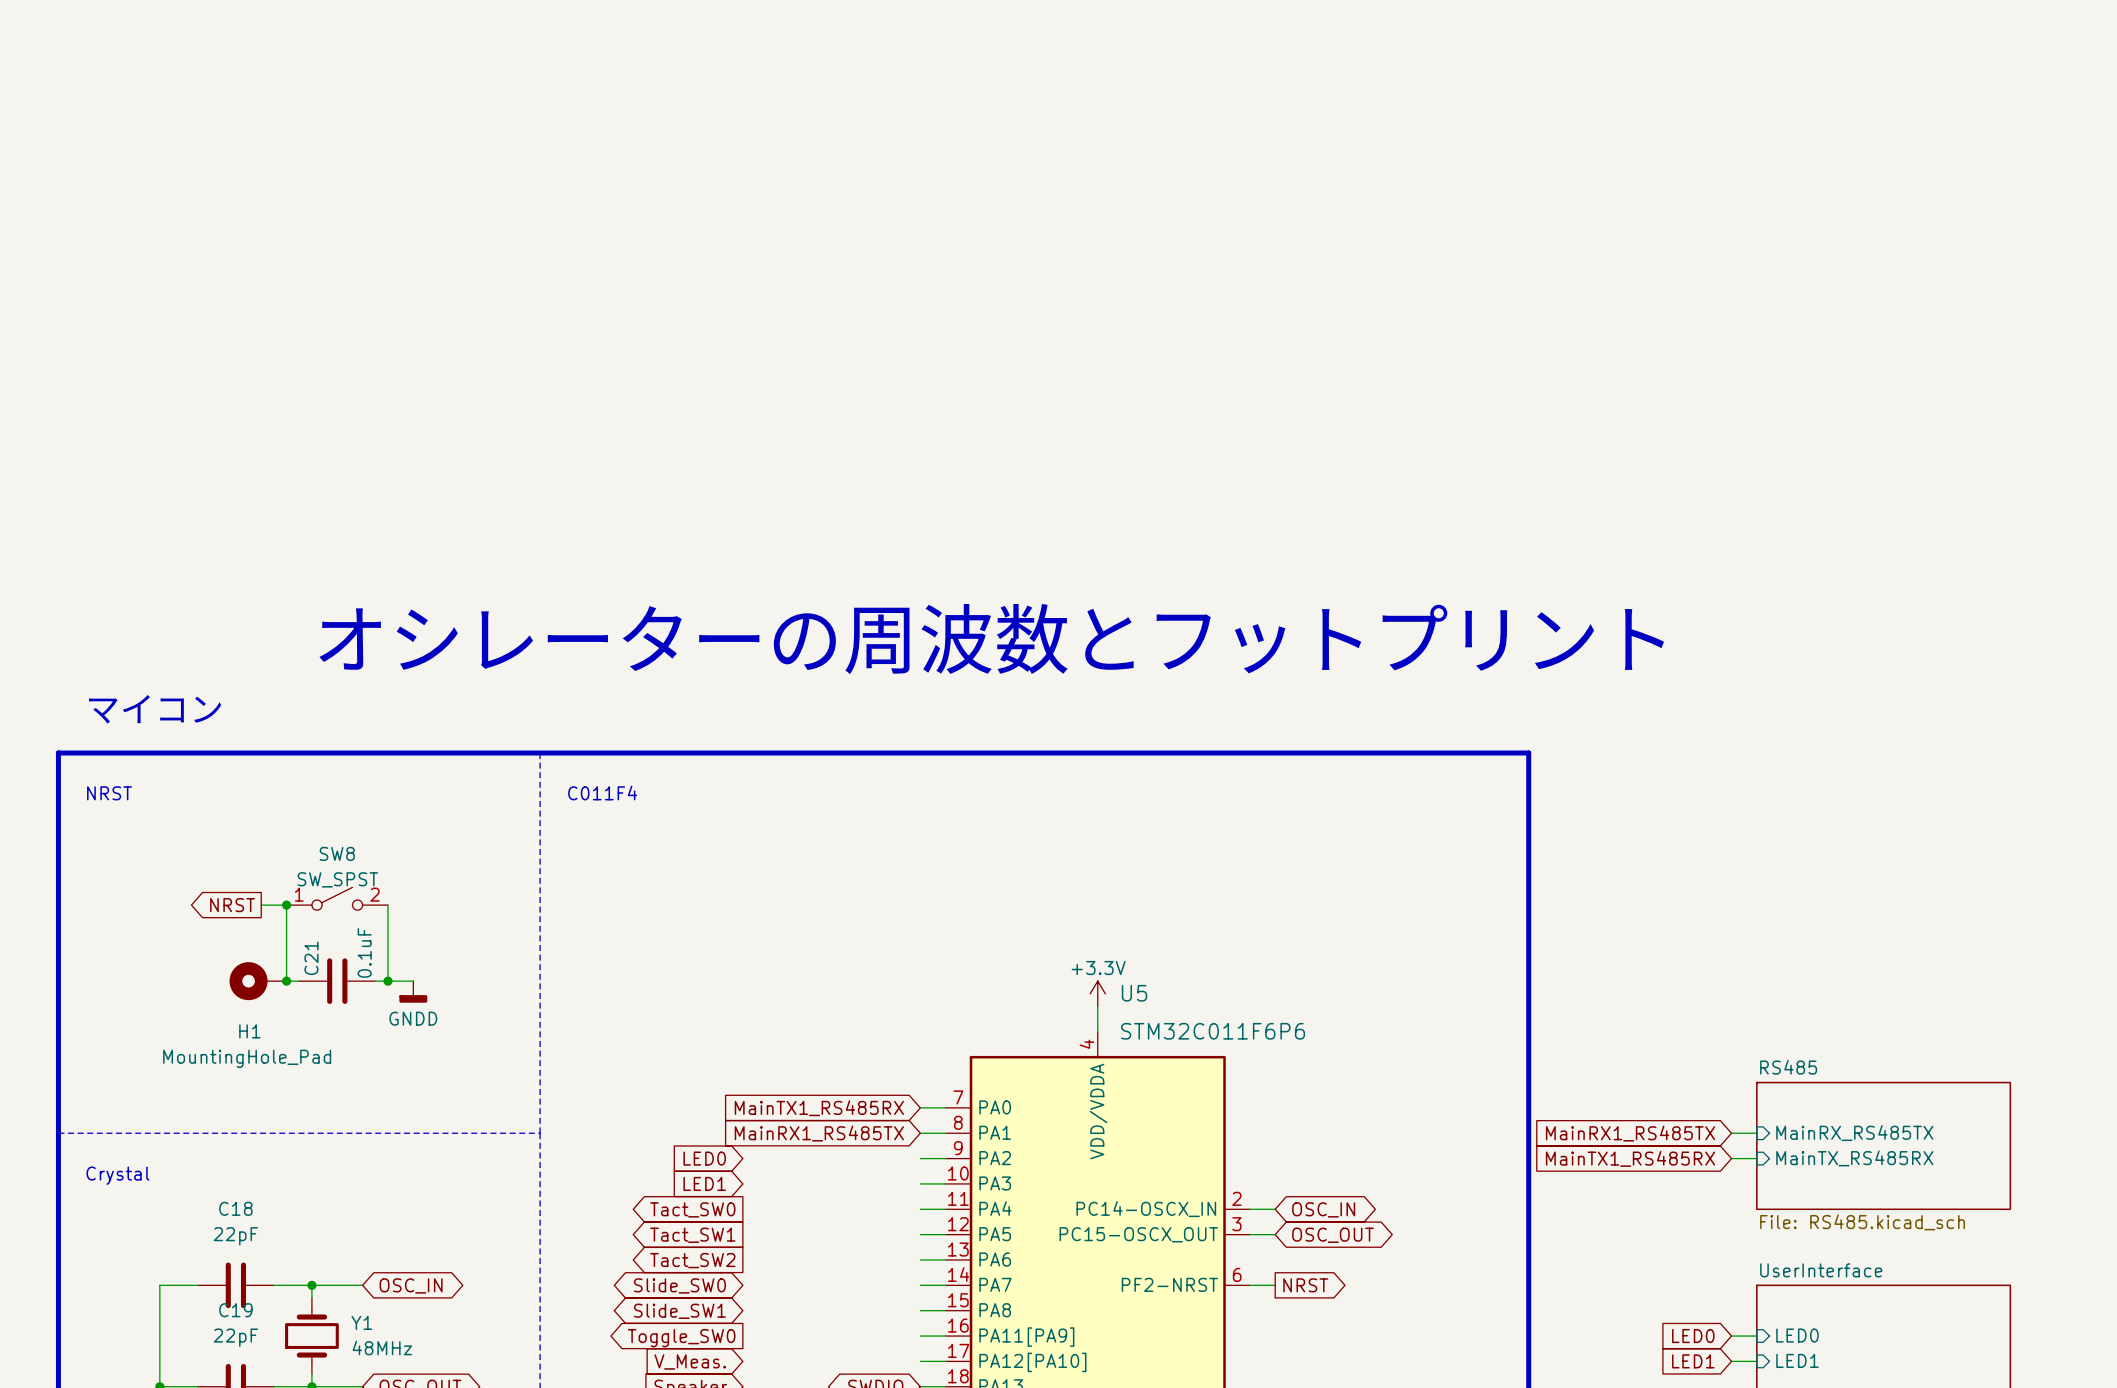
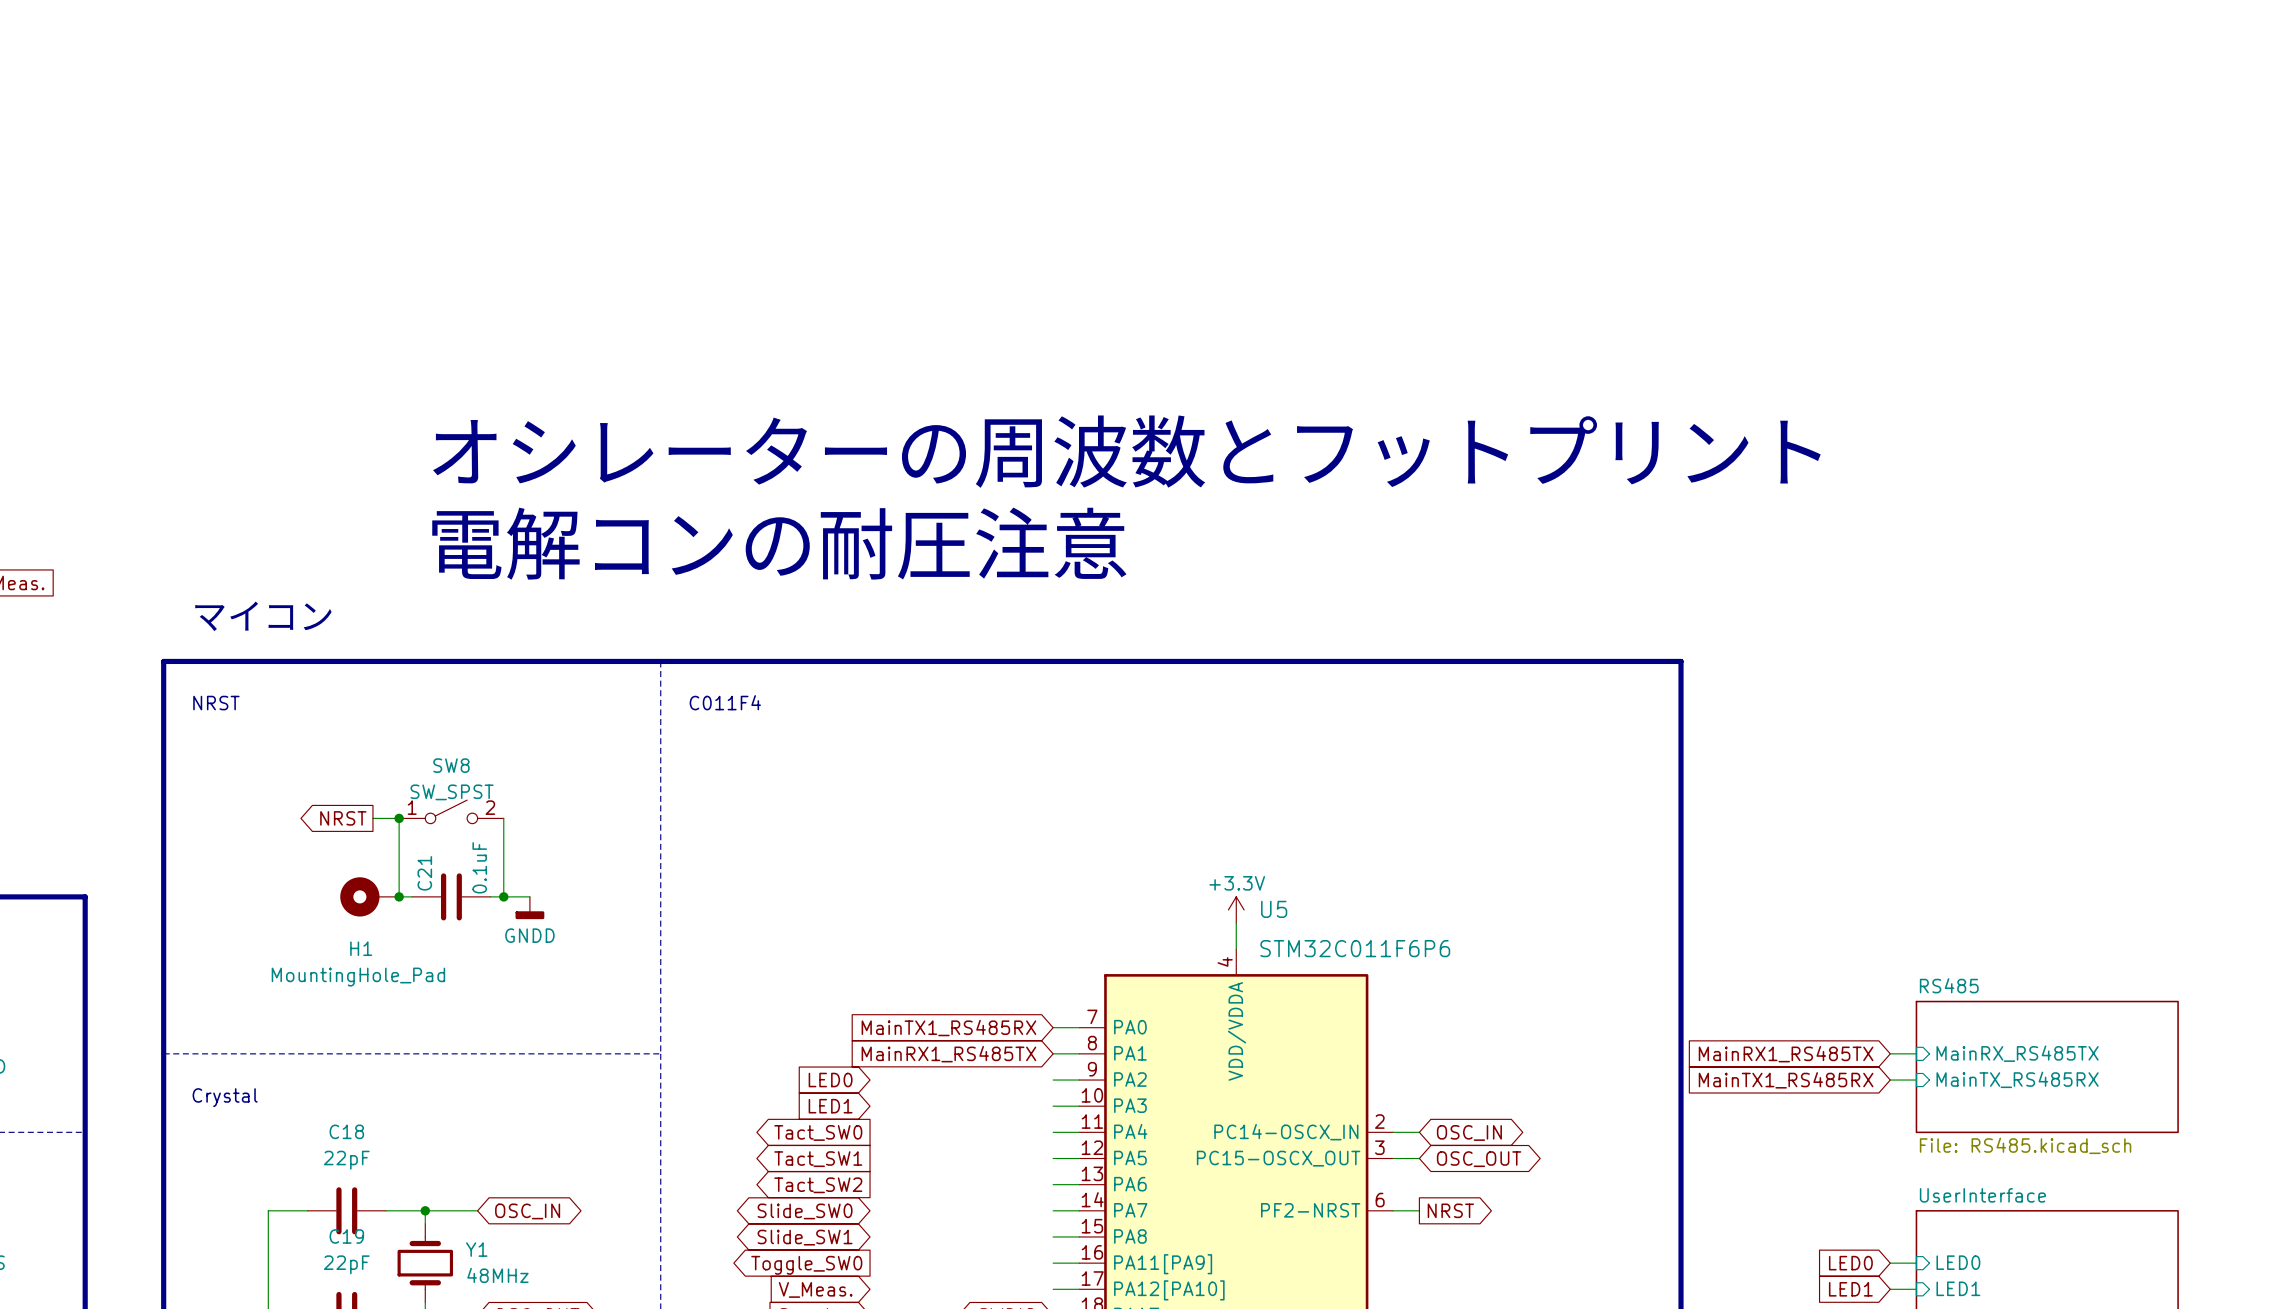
text: none -> オシレーターの周波数とフットプリント (1126, 451)
text: オシレーターの周波数とフットプリント (991, 639) -> 電解コンの耐圧注意 (779, 543)

